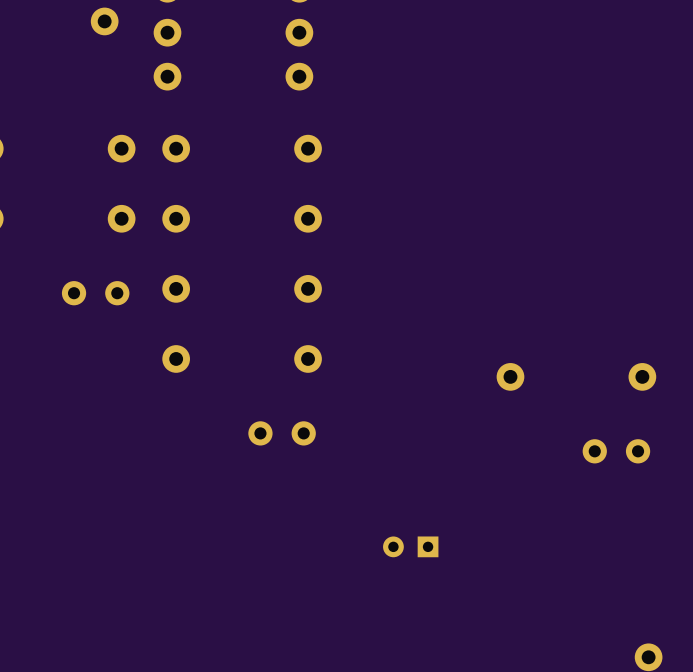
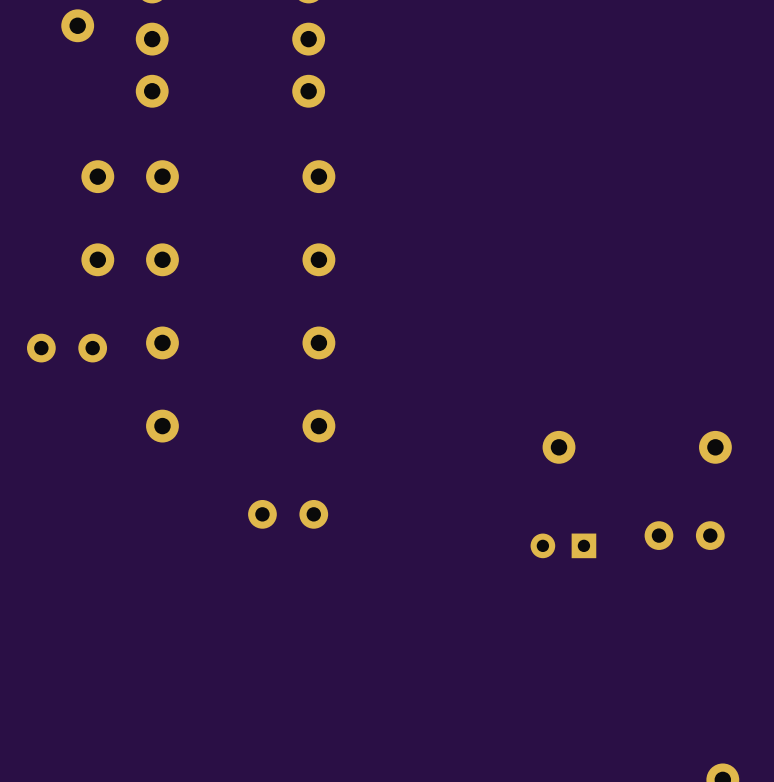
part position: (410, 546) -> (563, 545)

